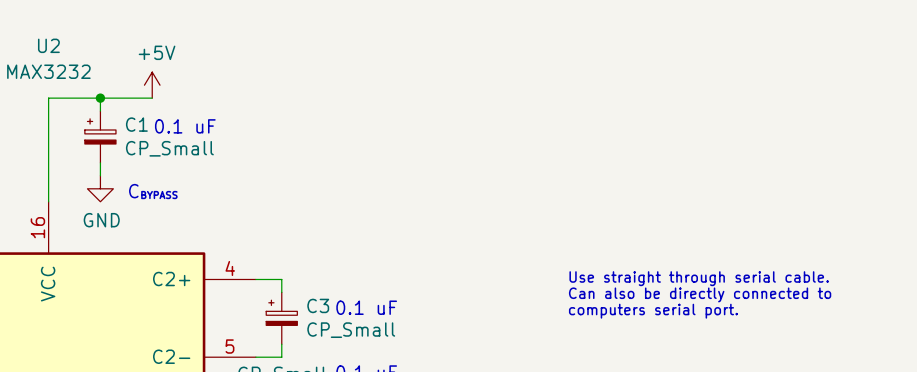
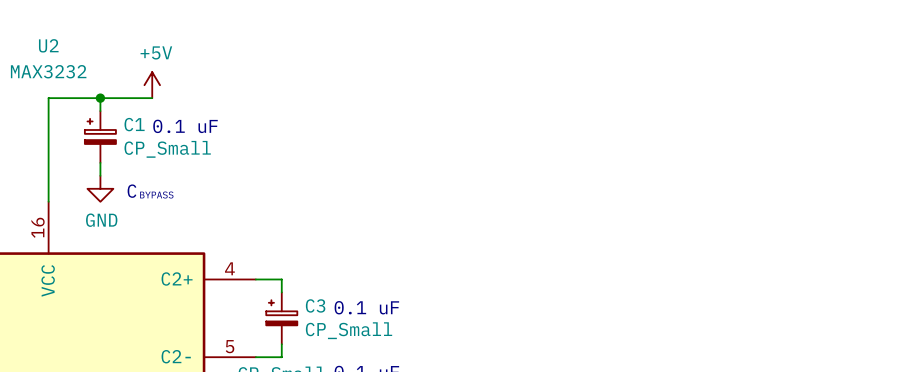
text: Use straight through serial cable. (699, 278) -> none
text: Can also be directly connected to (700, 294) -> none
text: computers serial port. (653, 311) -> none

